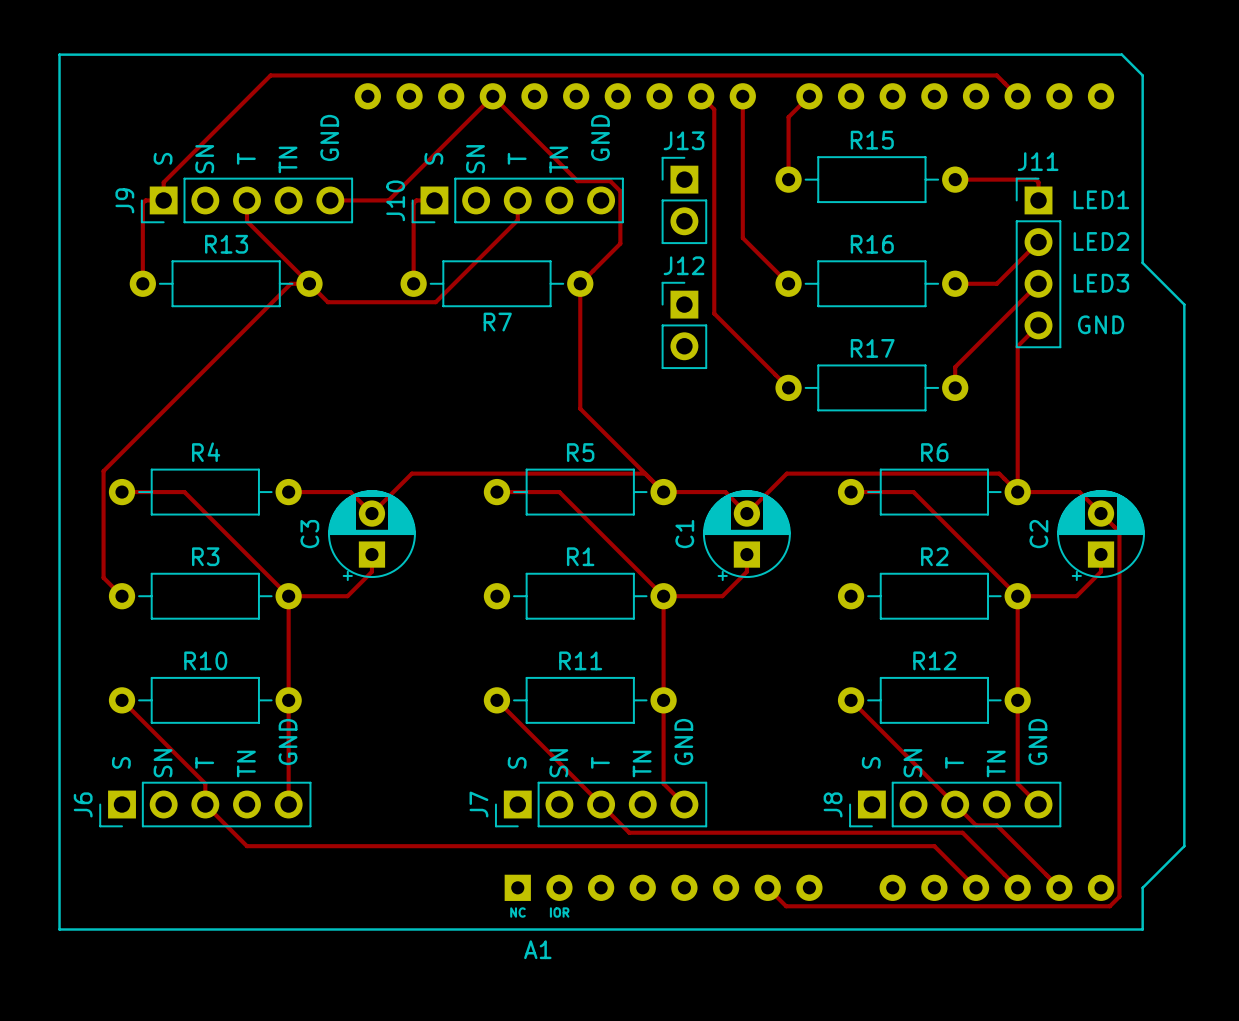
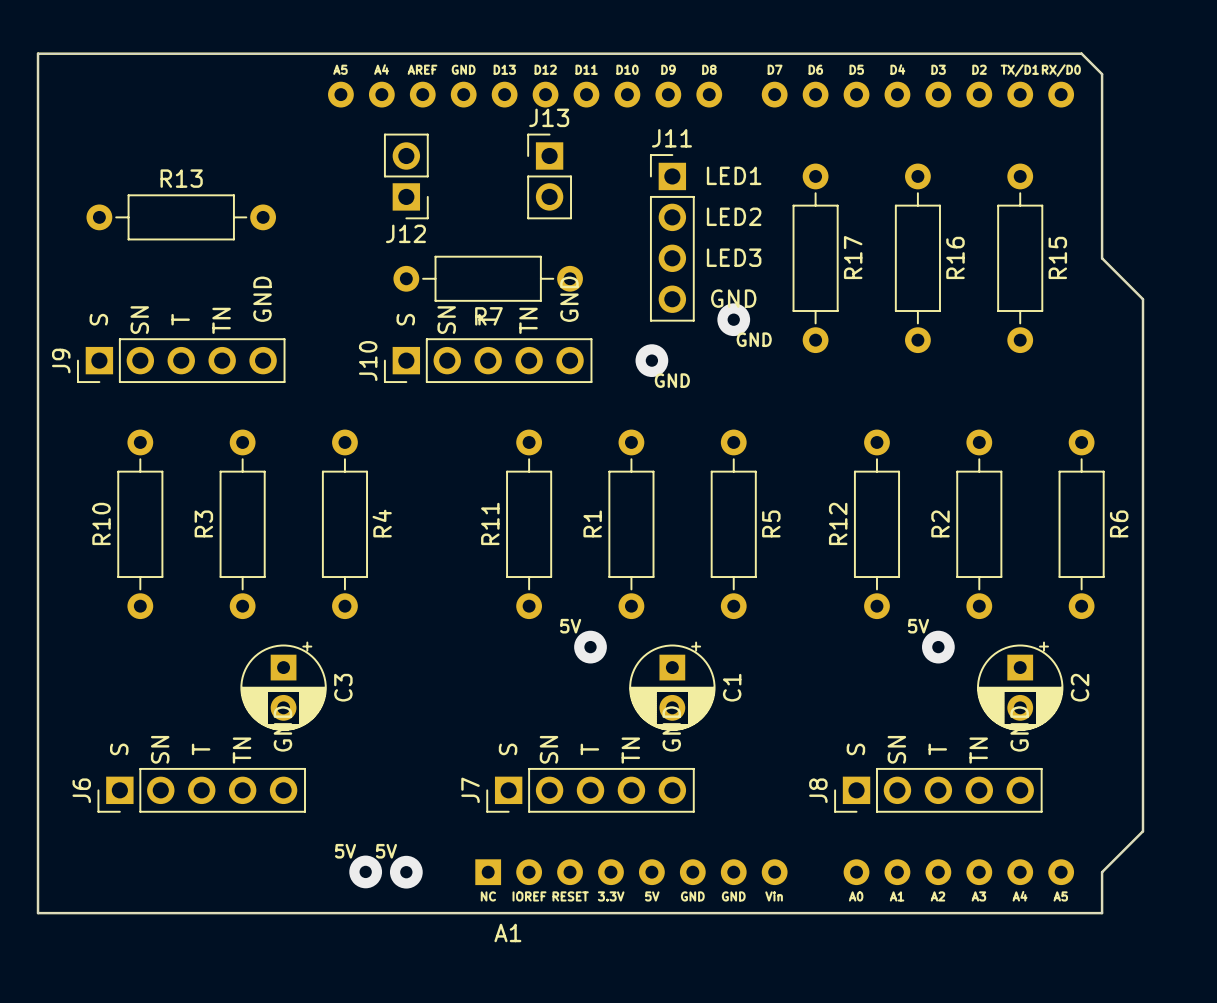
A1 footprint: [58, 53, 1186, 931] -> [36, 52, 1145, 915]
track: (701, 96) (714, 109) (714, 313) (788, 387) -> none
track: (742, 96) (742, 238) (788, 283) -> none
track: (809, 96) (788, 117) (788, 179) -> none
track: (1017, 96) (996, 75) (270, 75) (163, 182) (163, 200) (145, 200) (142, 203) (142, 283) -> none
R15 rotation: 0° (871, 179) -> 90° clockwise (1020, 258)
R15 position: (871, 179) -> (1020, 258)
track: (955, 179) (1035, 179) (1038, 182) (1038, 200) -> none
track: (246, 200) (246, 221) (327, 302) (435, 302) (517, 220) (517, 200) -> none
J9 position: (246, 200) -> (181, 360)
track: (330, 200) (388, 200) (492, 96) (577, 181) (610, 181) (620, 191) (620, 243) (580, 283) (580, 408) (663, 492) (725, 492) (746, 513) (786, 473) (999, 473) (1017, 492) -> none
track: (434, 200) (416, 200) (413, 203) (413, 283) -> none
J10 position: (517, 200) -> (488, 360)
J13 position: (684, 200) -> (549, 176)
track: (1038, 242) (996, 283) (955, 283) -> none
J11 position: (1038, 262) -> (672, 237)
R13 position: (226, 283) -> (181, 217)
track: (309, 283) (290, 283) (103, 471) (103, 577) (122, 596) -> none
R16 rotation: 0° (871, 283) -> 90° clockwise (917, 258)
track: (1038, 283) (955, 367) (955, 387) -> none
J12 rotation: 0° (684, 325) -> 180° (406, 176)
J12 position: (684, 325) -> (406, 176)
via: none -> (733, 319)
track: (1038, 325) (1017, 346) (1017, 492) -> none
text: none -> GND (754, 339)
via: none -> (651, 360)
text: none -> GND (672, 380)
R17 rotation: 0° (871, 387) -> 90° clockwise (815, 258)
R17 position: (871, 387) -> (815, 258)
track: (645, 473) (411, 473) (371, 513) (350, 492) (288, 492) -> none
track: (122, 492) (184, 492) (288, 596) -> none
R4 rotation: 0° (205, 492) -> 90° clockwise (344, 524)
R4 position: (205, 492) -> (344, 524)
track: (496, 492) (559, 492) (663, 596) -> none
R5 rotation: 0° (580, 492) -> 90° clockwise (733, 524)
R5 position: (580, 492) -> (733, 524)
track: (851, 492) (913, 492) (1017, 596) -> none
R6 rotation: 0° (934, 492) -> 90° clockwise (1081, 524)
R6 position: (934, 492) -> (1081, 524)
track: (1017, 492) (1079, 492) (1119, 532) (1119, 896) (1109, 906) (786, 906) (767, 887) -> none
C3 rotation: 0° (371, 535) -> 180° (283, 686)
C3 position: (371, 535) -> (283, 686)
C1 rotation: 0° (746, 535) -> 180° (672, 686)
C1 position: (746, 535) -> (672, 686)
C2 rotation: 0° (1101, 535) -> 180° (1020, 686)
C2 position: (1101, 535) -> (1020, 686)
track: (371, 554) (371, 571) (347, 596) (288, 596) -> none
track: (746, 554) (746, 571) (722, 596) (663, 596) -> none
track: (1101, 554) (1101, 571) (1076, 596) (1017, 596) -> none
R3 name position: R3 (205, 556) -> R3 (203, 523)
R1 name position: R1 (580, 556) -> R1 (592, 523)
R2 name position: R2 (934, 556) -> R2 (940, 523)
R3 rotation: 0° (205, 596) -> 90° clockwise (242, 524)
track: (288, 596) (288, 804) -> none
R1 rotation: 0° (580, 596) -> 90° clockwise (631, 524)
track: (663, 596) (663, 783) (684, 804) -> none
R2 rotation: 0° (934, 596) -> 90° clockwise (979, 524)
track: (1017, 596) (1017, 783) (1038, 804) -> none
text: none -> 5V (570, 626)
text: none -> 5V (918, 626)
via: none -> (590, 647)
via: none -> (938, 647)
R10 name position: R10 (205, 660) -> R10 (101, 523)
R11 name position: R11 (580, 660) -> R11 (490, 523)
R12 name position: R12 (934, 660) -> R12 (838, 523)
track: (122, 700) (205, 783) (205, 804) (246, 846) (934, 846) (976, 887) -> none
R10 rotation: 0° (205, 700) -> 90° clockwise (140, 524)
R10 position: (205, 700) -> (140, 524)
track: (496, 700) (629, 832) (962, 832) (1017, 887) -> none
R11 rotation: 0° (580, 700) -> 90° clockwise (529, 524)
R11 position: (580, 700) -> (529, 524)
track: (851, 700) (976, 825) (996, 825) (1059, 887) -> none
R12 rotation: 0° (934, 700) -> 90° clockwise (876, 524)
R12 position: (934, 700) -> (876, 524)
text: none -> 5V (345, 851)
text: none -> 5V (386, 851)
via: none -> (365, 871)
via: none -> (406, 872)

